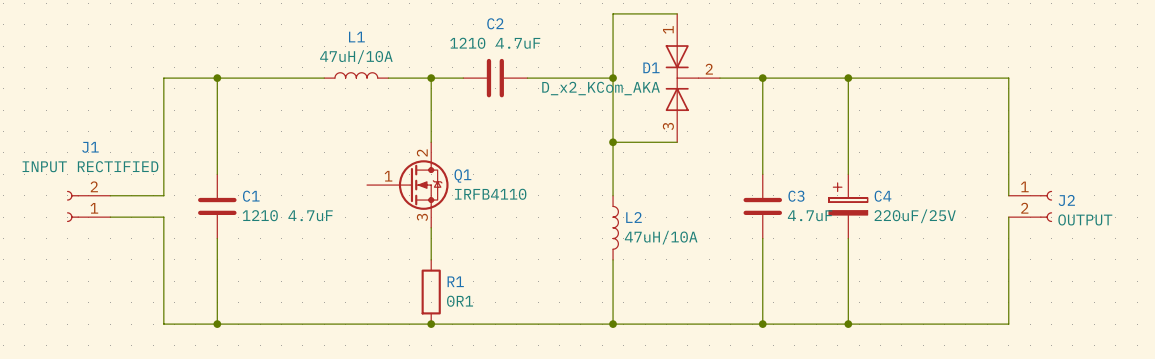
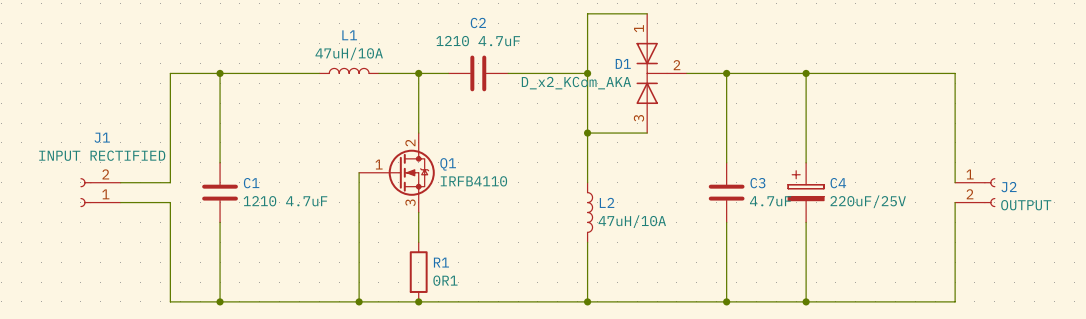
wire: none -> (359, 172) (359, 301)
junction: none -> (359, 301)

